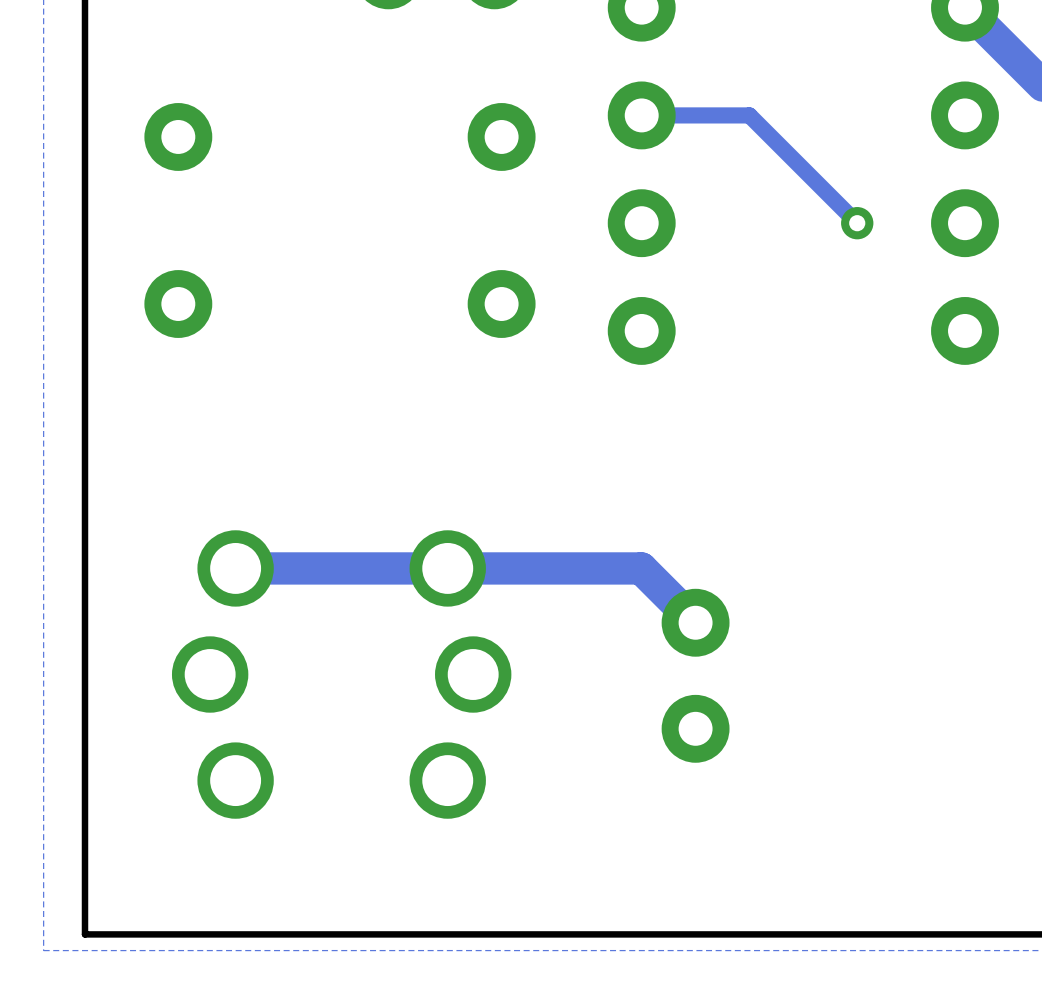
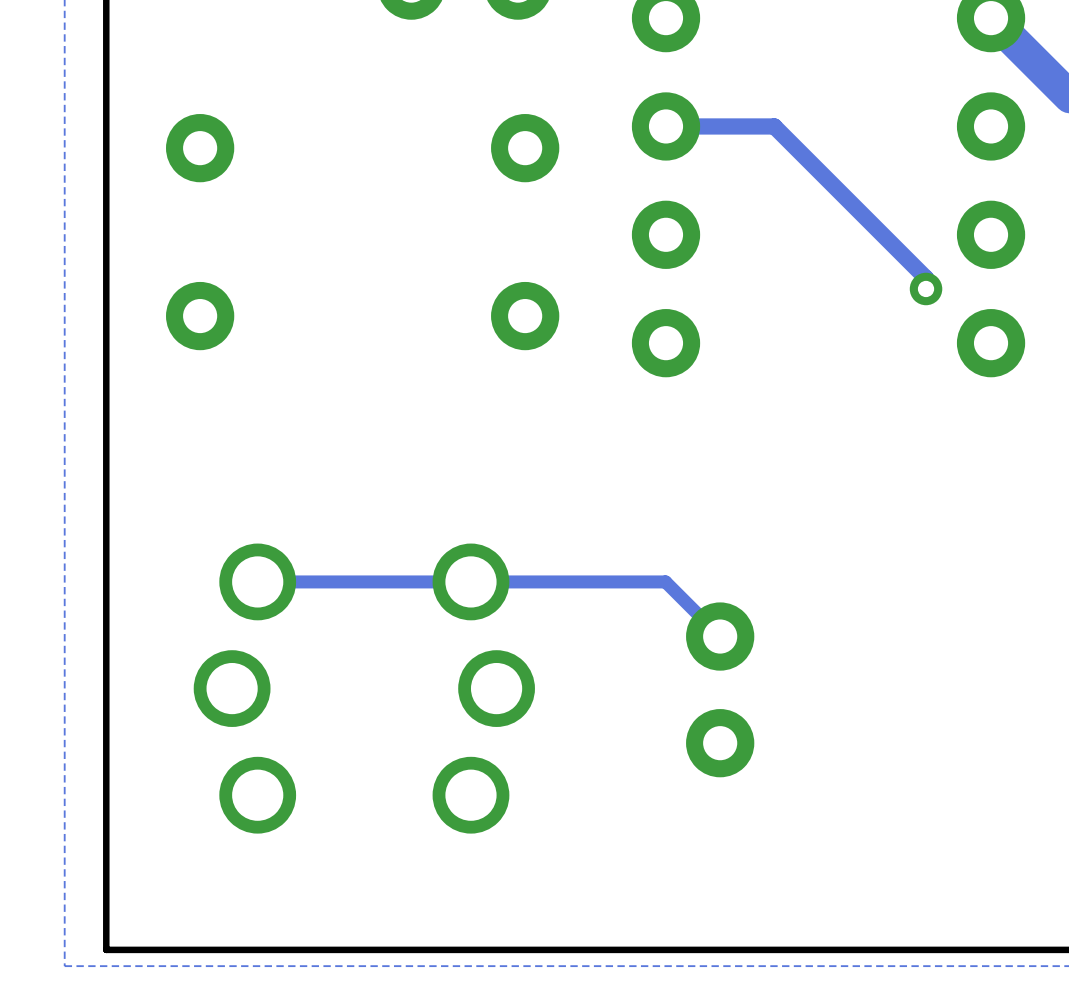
track: none -> (882, 234) (926, 278) (926, 288)
via position: (857, 223) -> (926, 288)
track width: thick (235, 568) (641, 568) (695, 622) -> thin (257, 581) (665, 581) (720, 636)

